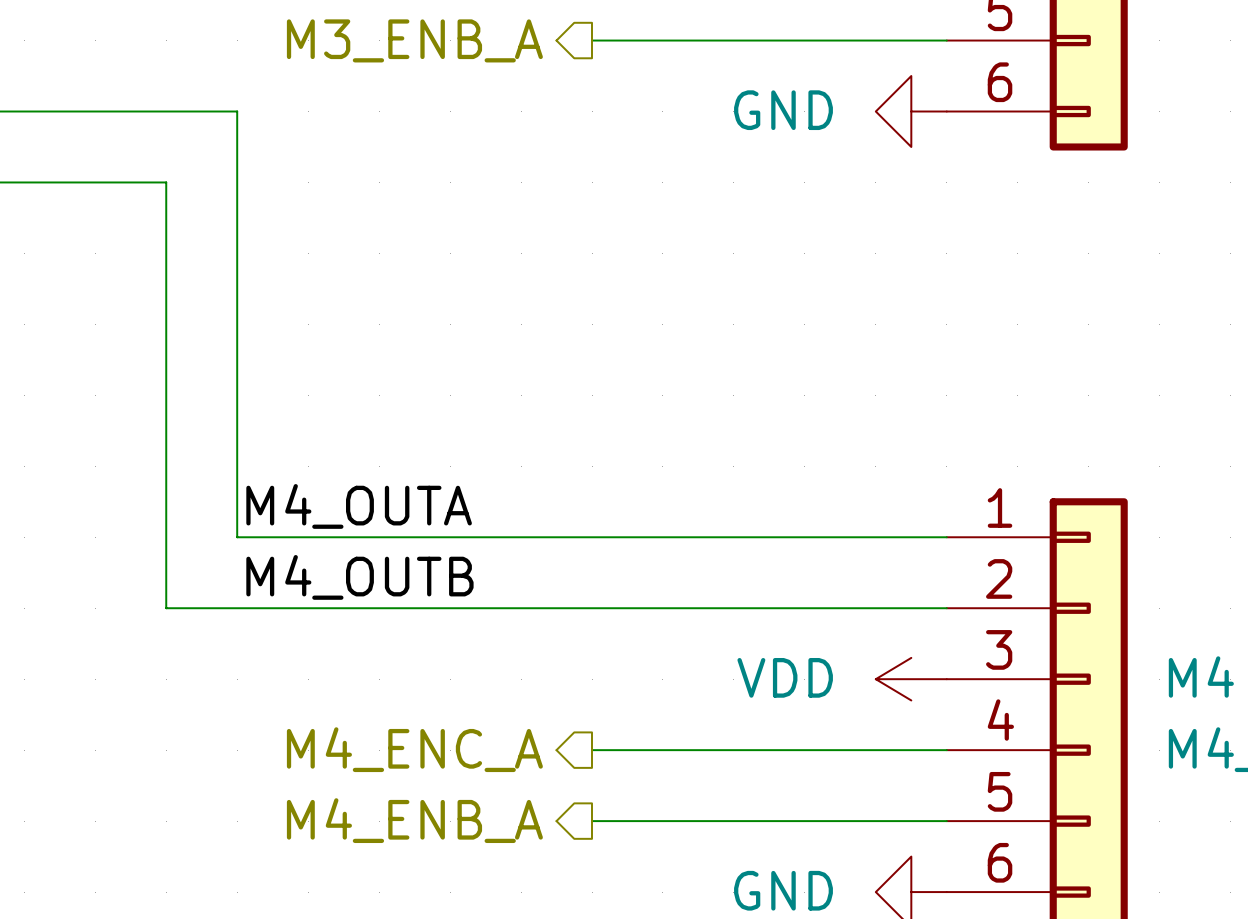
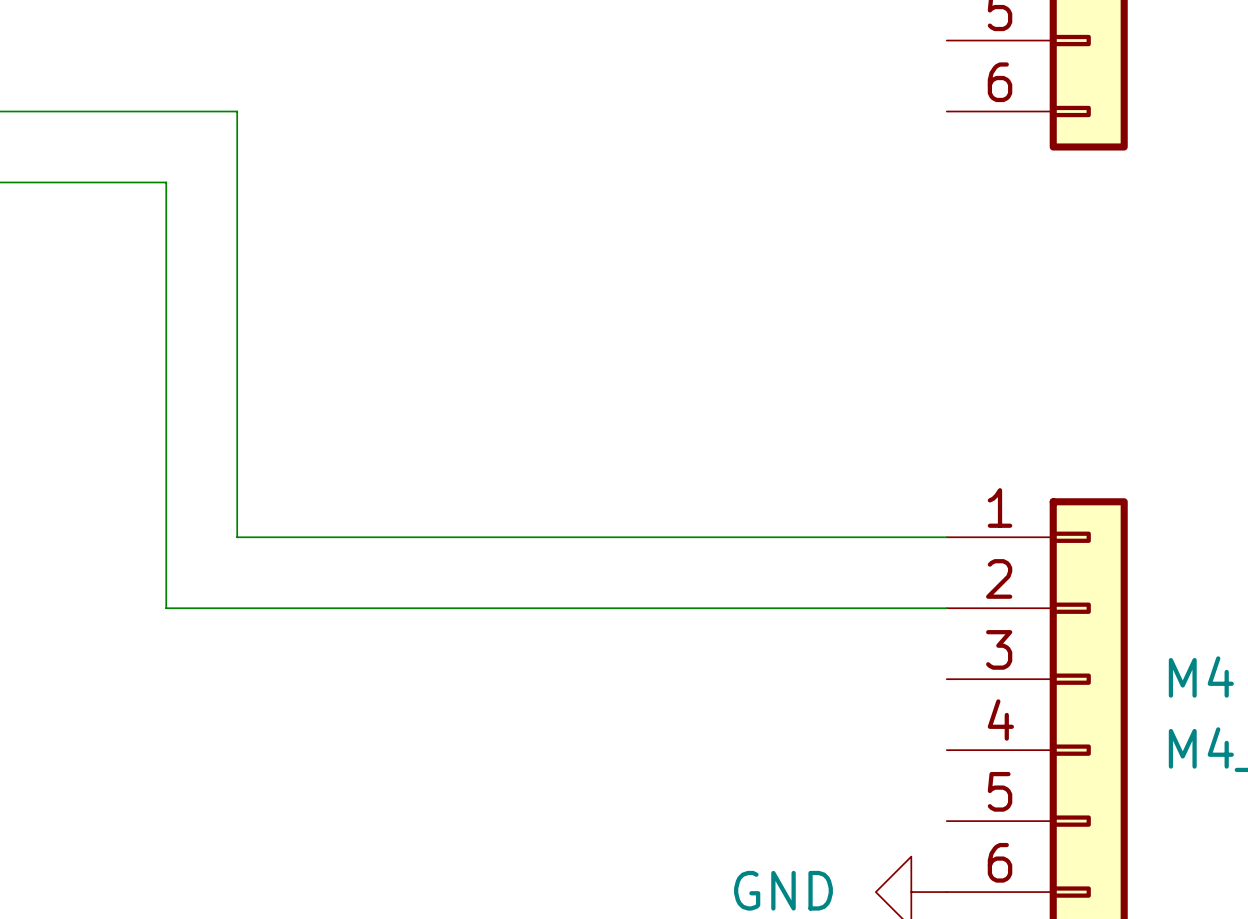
hierarchical label: M3_ENB_A (414, 40) -> none
wire: (592, 40) (946, 40) -> none
power symbol: GND (911, 111) -> none
label: M4_OUTA (359, 506) -> none
label: M4_OUTB (359, 577) -> none
power symbol: VDD (911, 679) -> none
hierarchical label: M4_ENC_A (414, 749) -> none
wire: (592, 750) (946, 750) -> none
hierarchical label: M4_ENB_A (414, 820) -> none
wire: (592, 821) (946, 821) -> none

